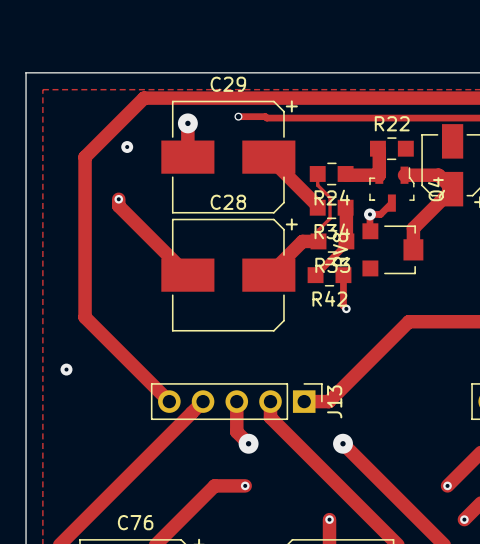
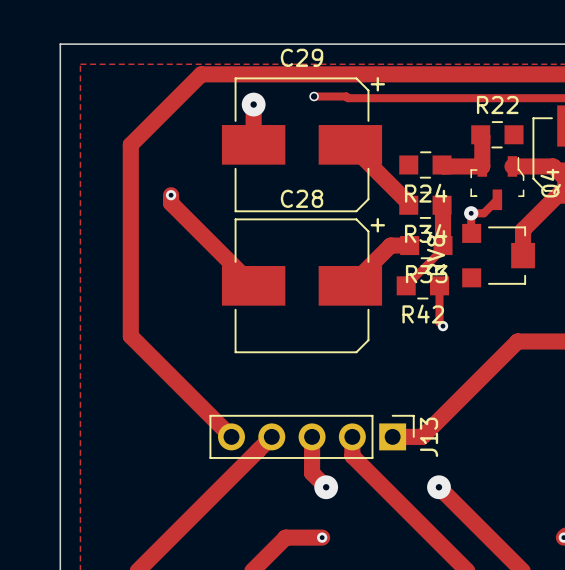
via: (127, 147) -> none
track: (317, 173) (317, 185) (330, 197) (330, 218) (318, 230) (318, 241) -> none
via: (66, 369) -> none

